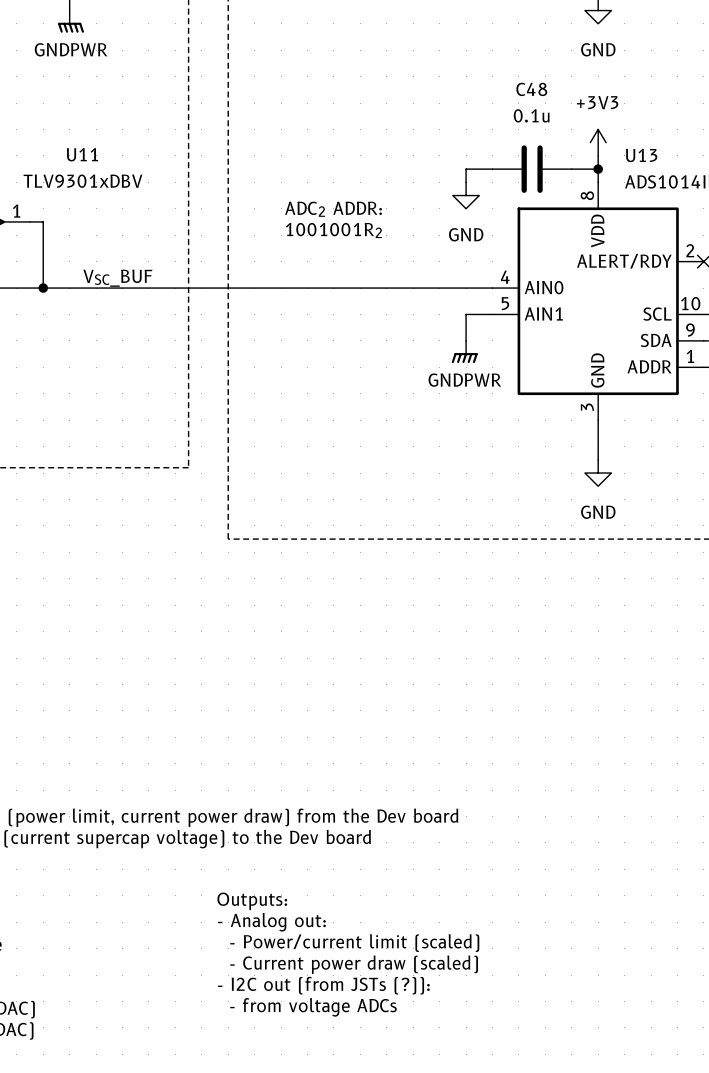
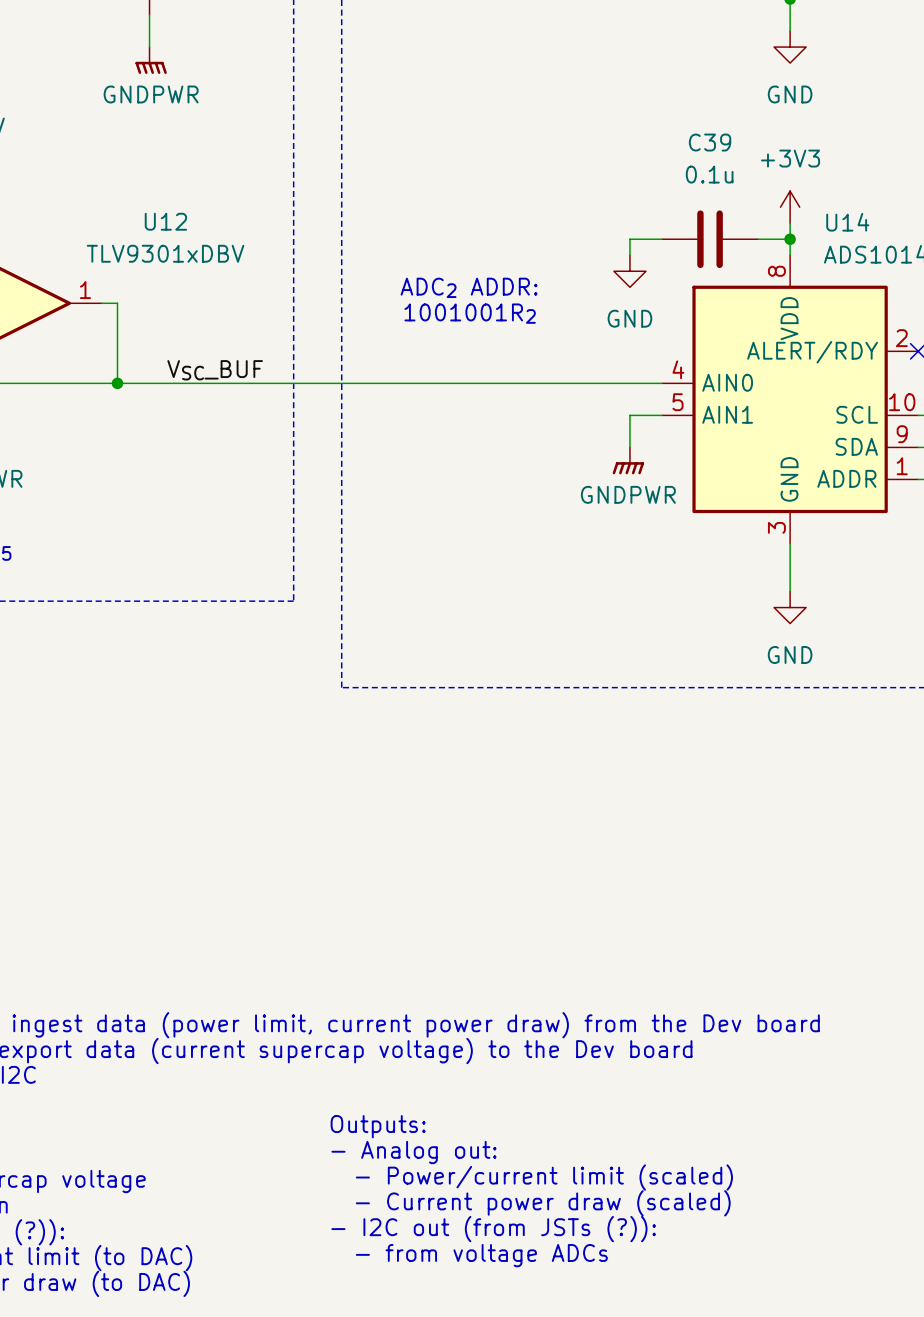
C48 name: C48 (531, 89) -> C39 (710, 142)
U11 name: U11 (82, 154) -> U12 (165, 221)
U13 name: U13 (641, 155) -> U14 (847, 222)

